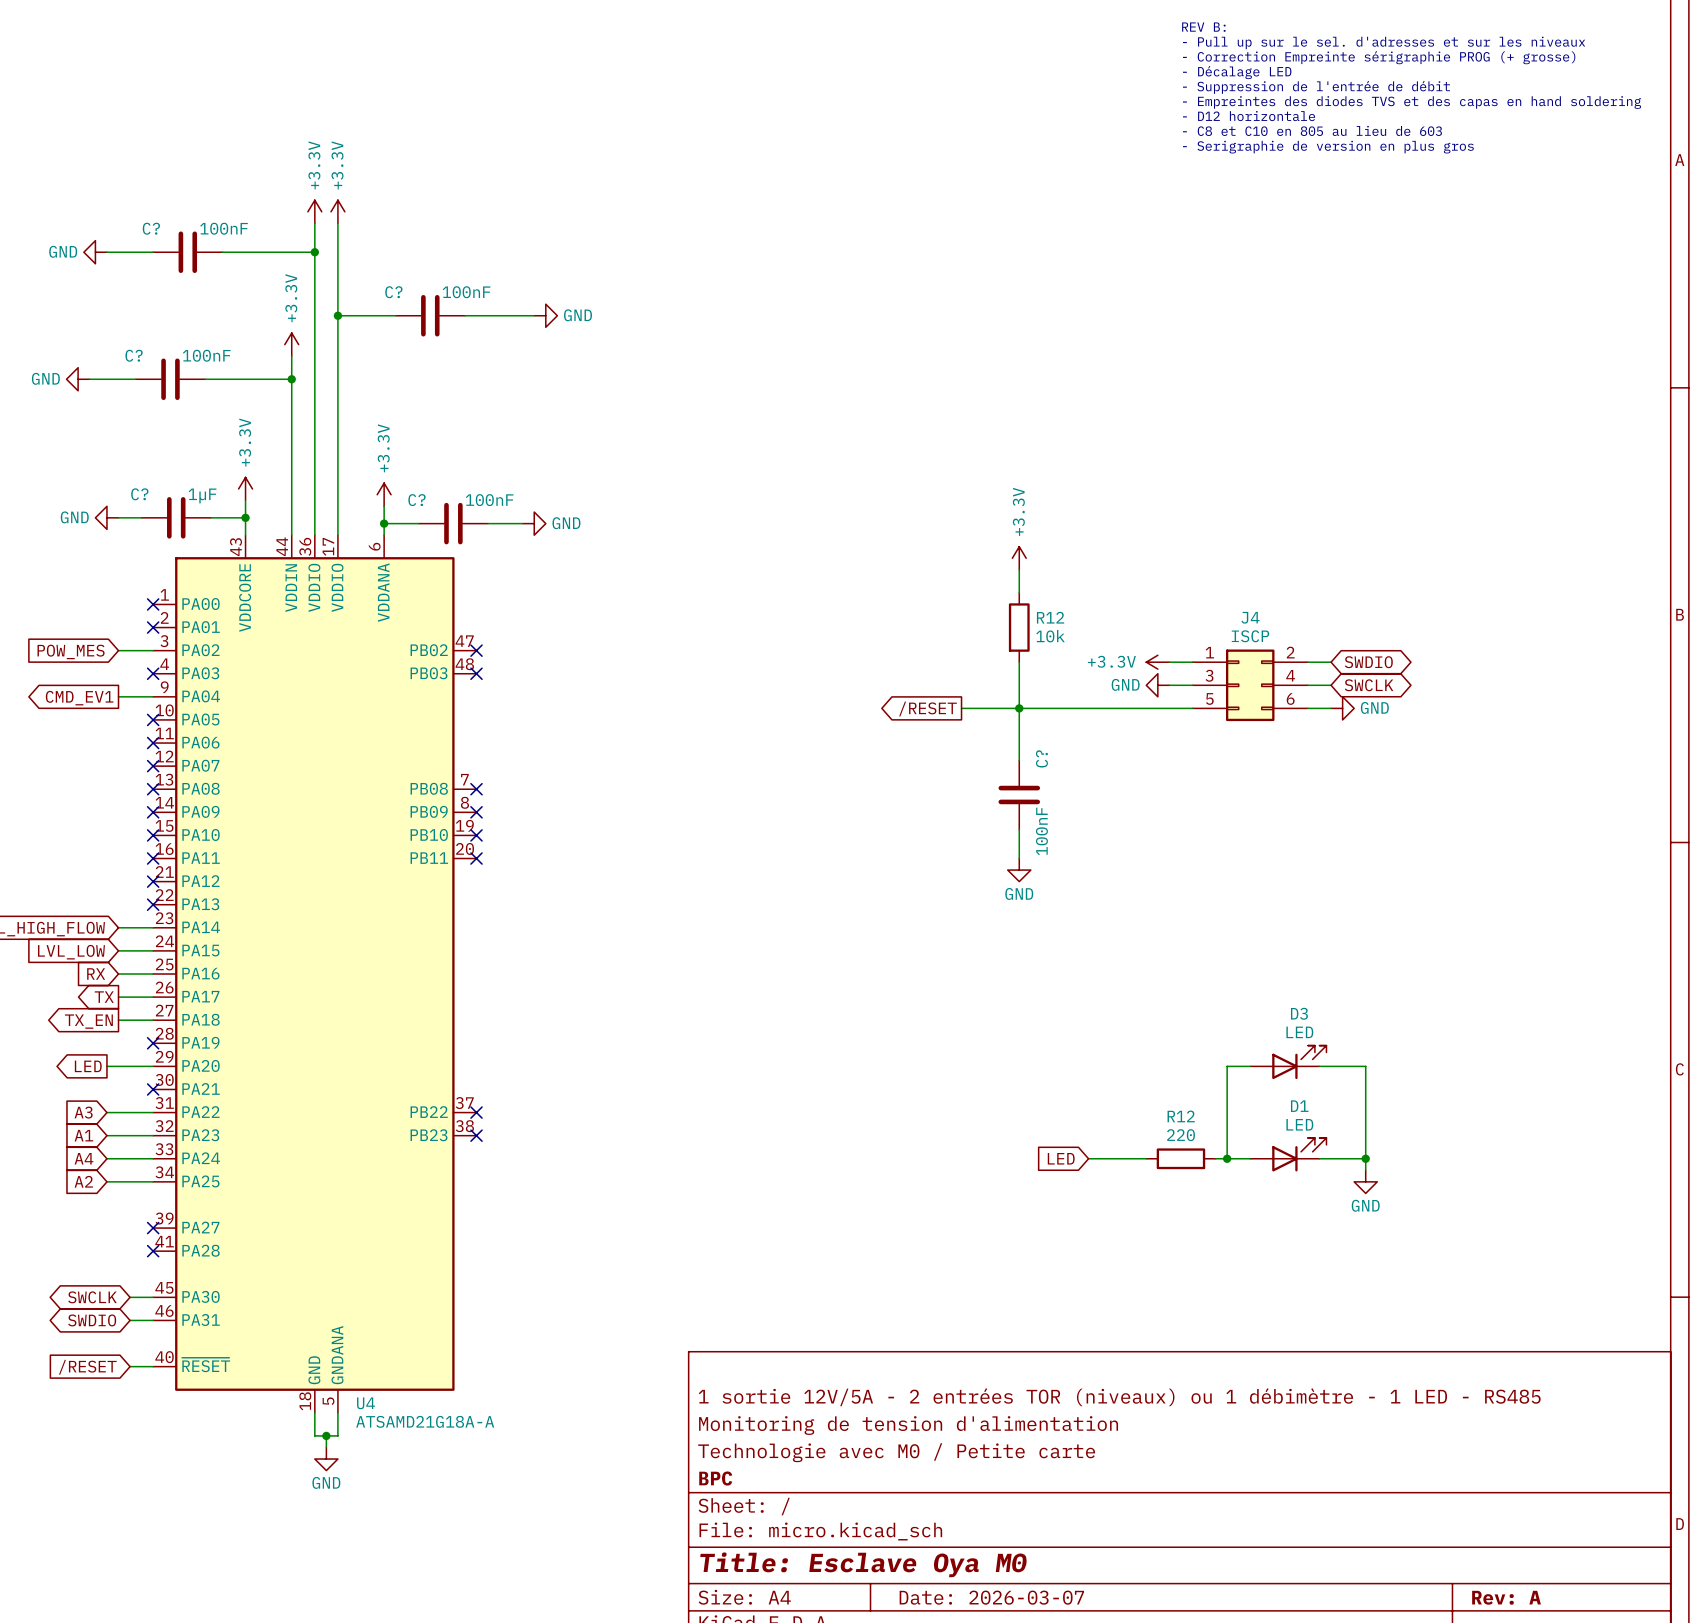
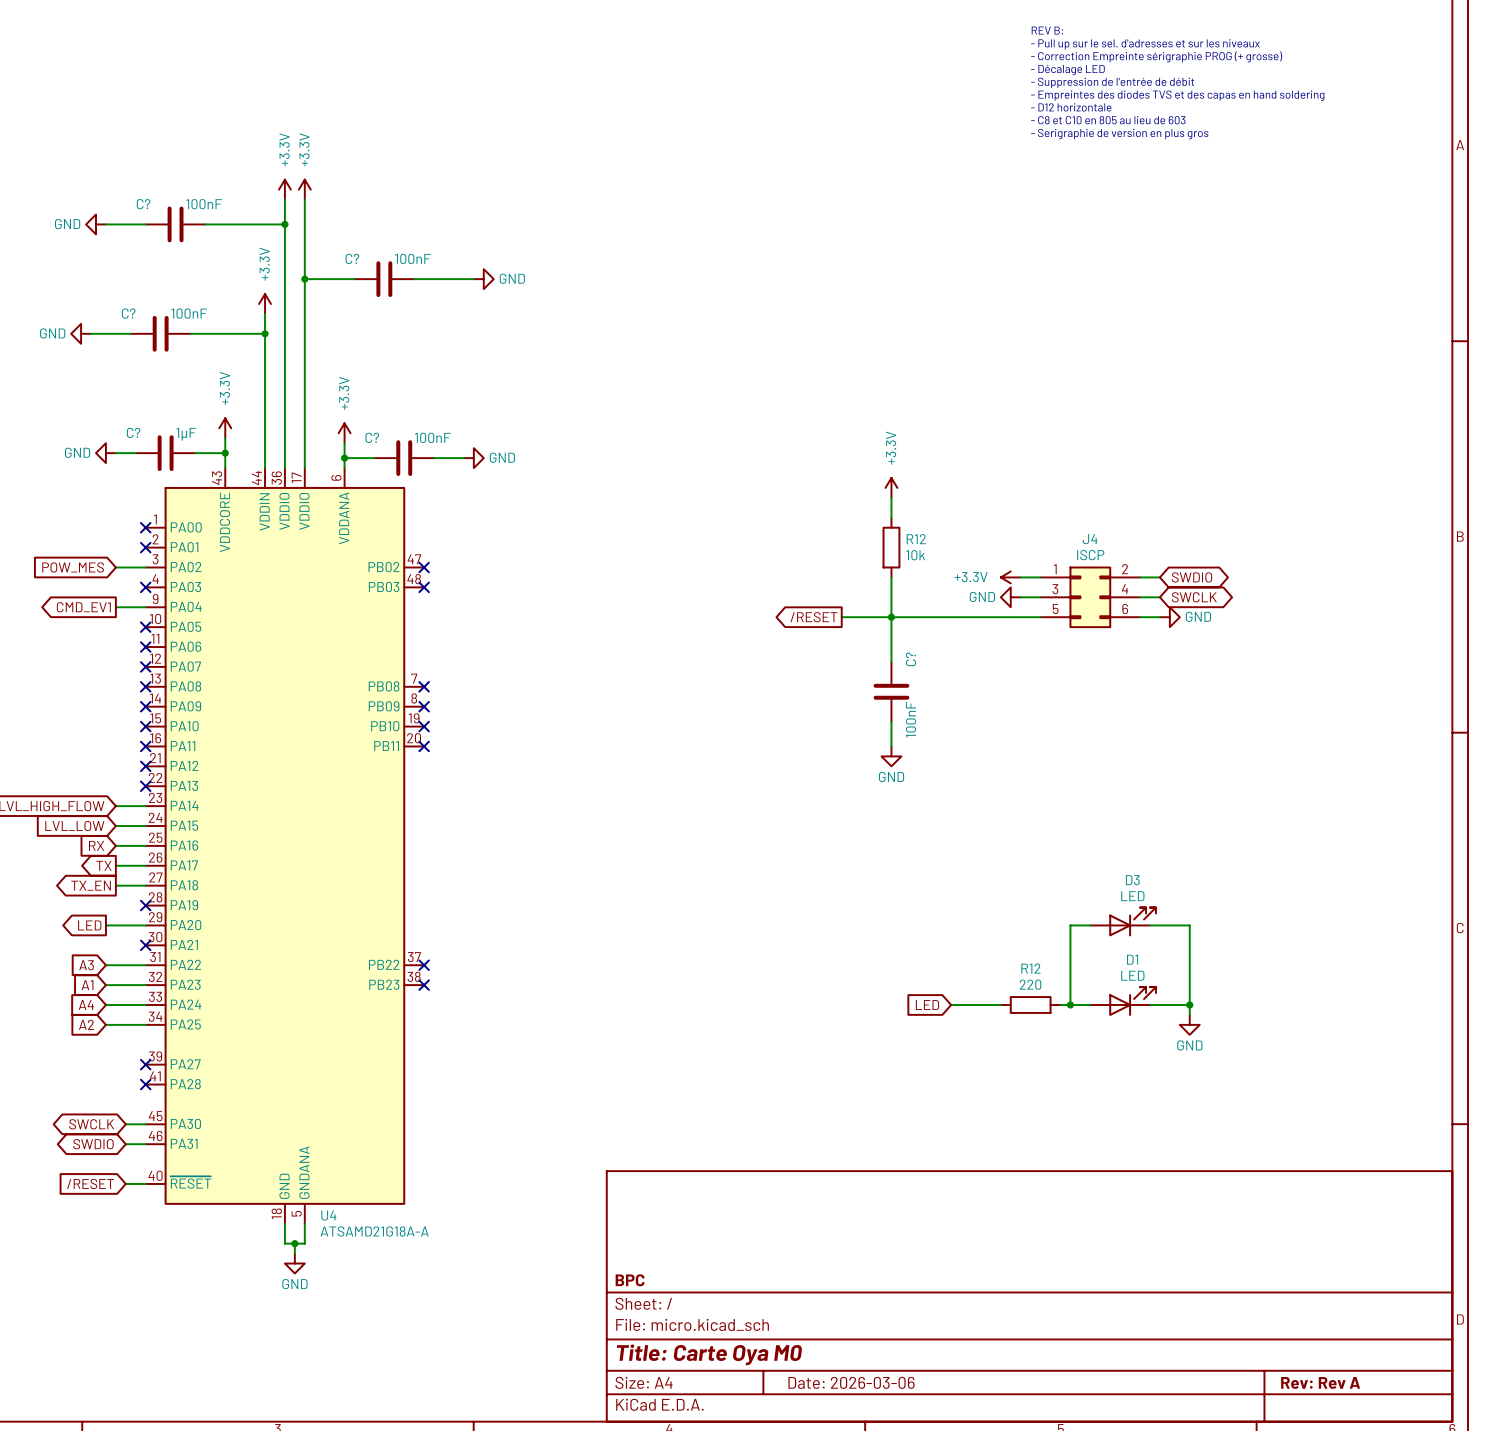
title block: 1 sortie 12V/5A - 2 entrées TOR (niveaux) ou 1 débimètre - 1 LED - RS485 (1119, 1397) -> none
title block: Monitoring de tension d'alimentation (908, 1425) -> none
title block: Technologie avec M0 / Petite carte (896, 1452) -> none
title block: Title: Esclave Oya M0 (863, 1564) -> Title: Carte Oya M0 (709, 1354)
title block: Date: 2026-03-07 (991, 1597) -> Date: 2026-03-06 (851, 1382)
title block: Rev: A (1506, 1597) -> Rev: Rev A (1320, 1382)

